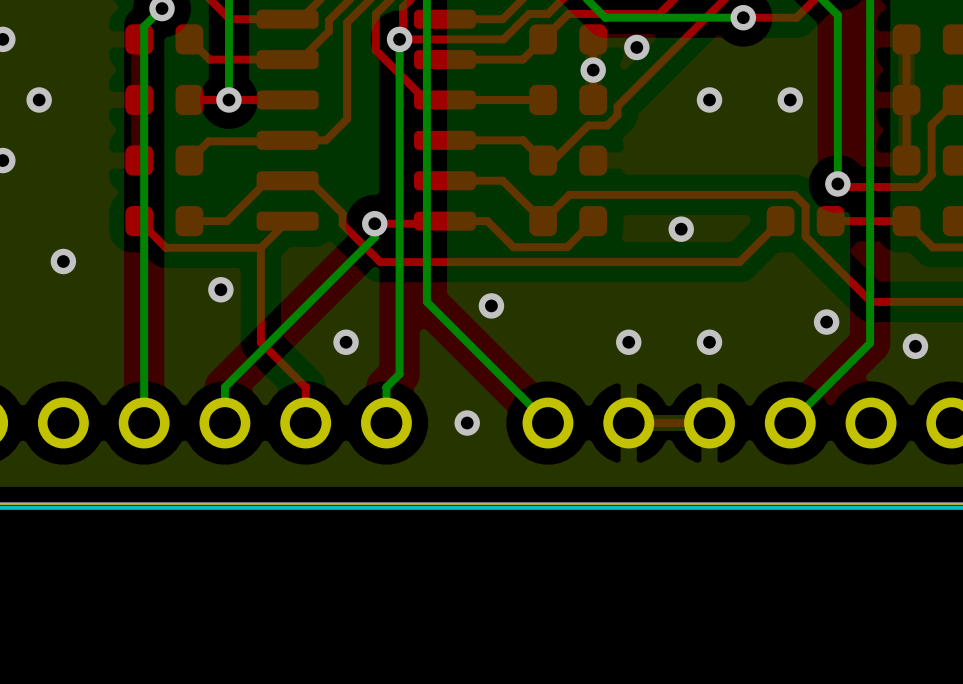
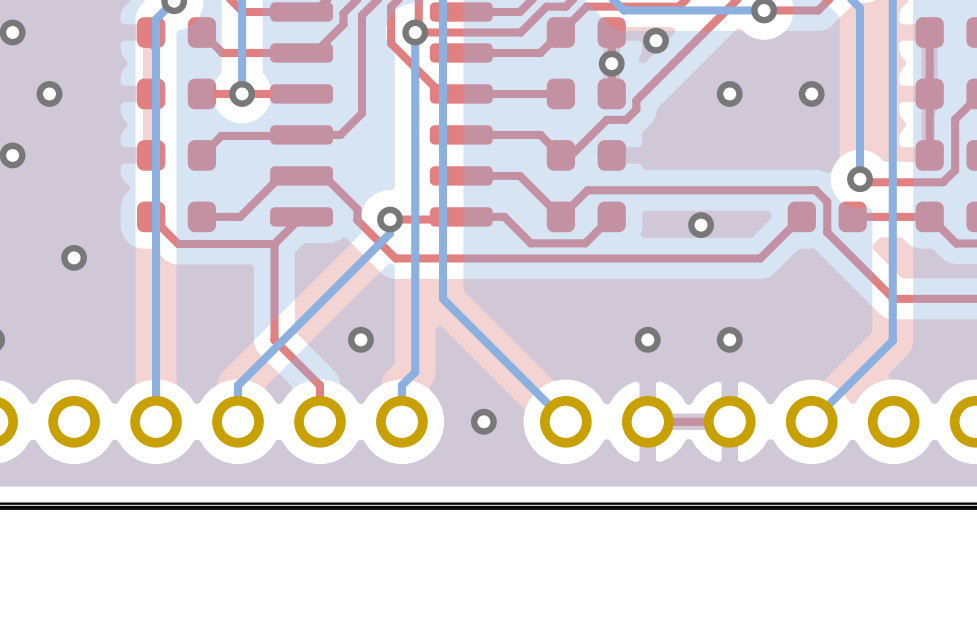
via: (220, 289) -> none
via: (491, 305) -> none
via: (826, 322) -> none
via: (915, 346) -> none

